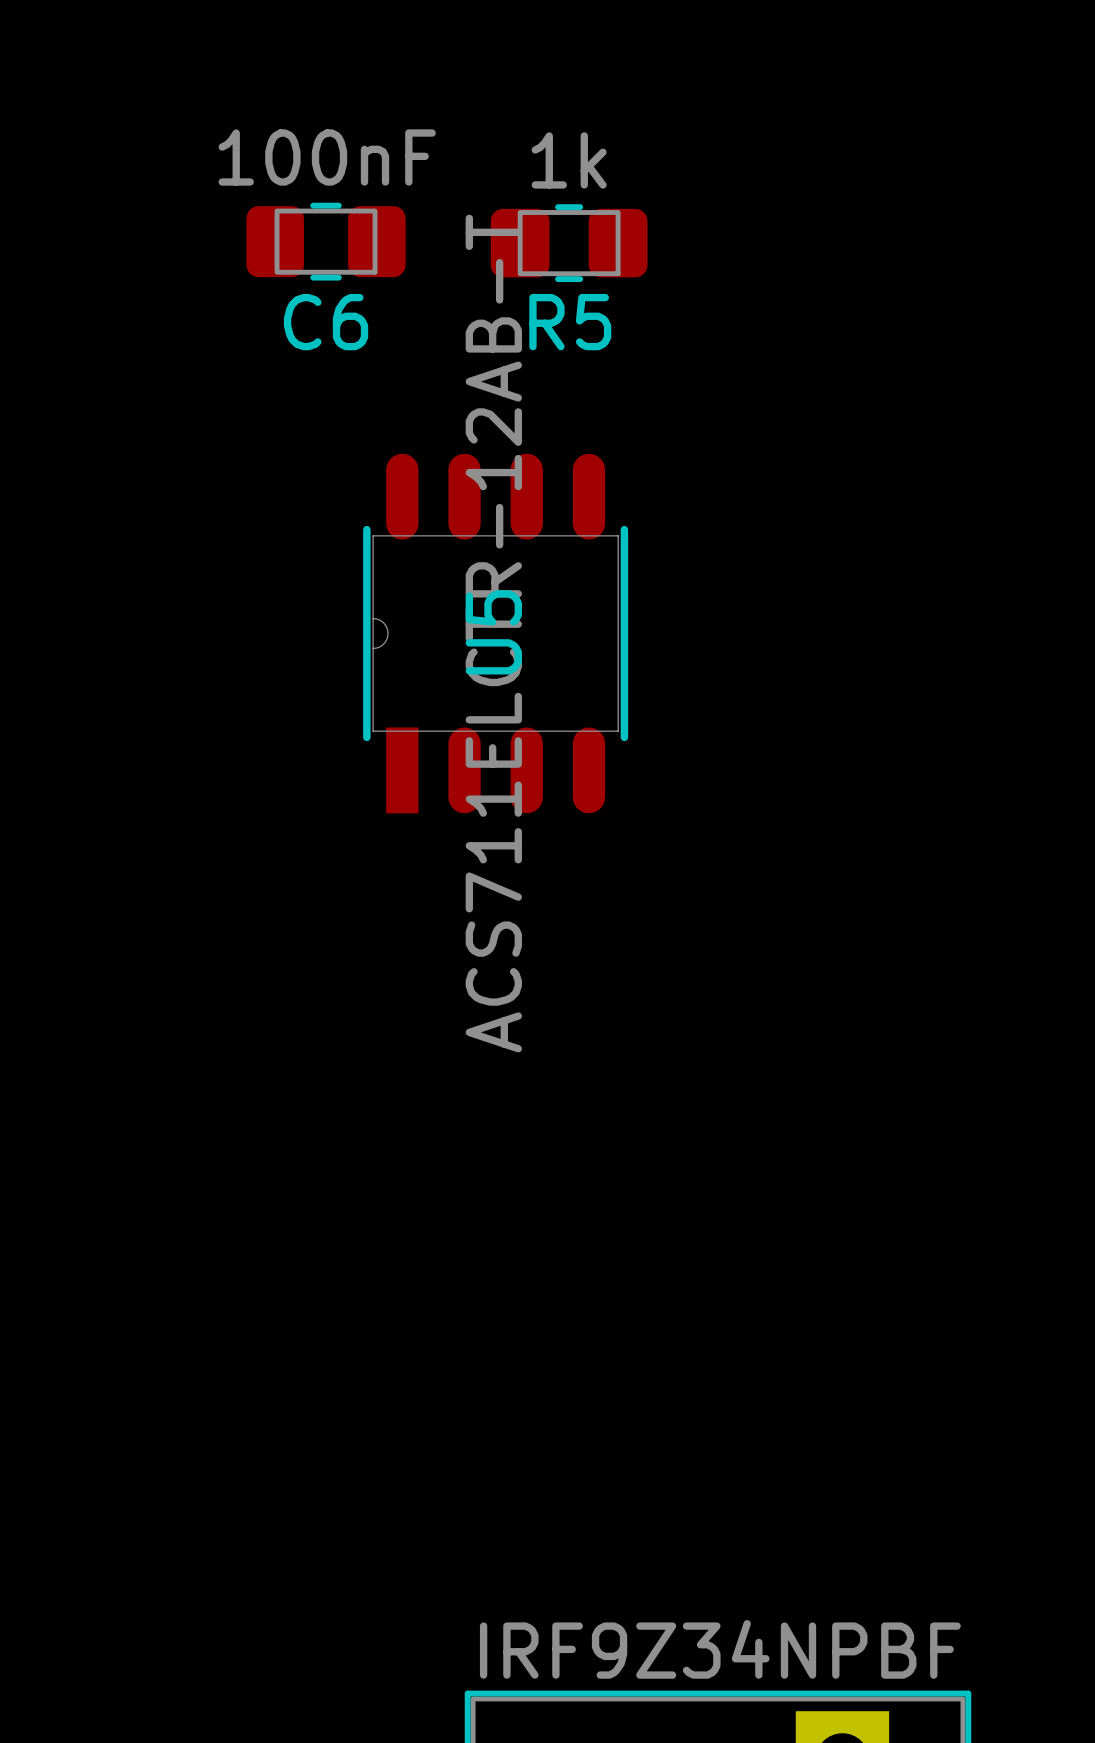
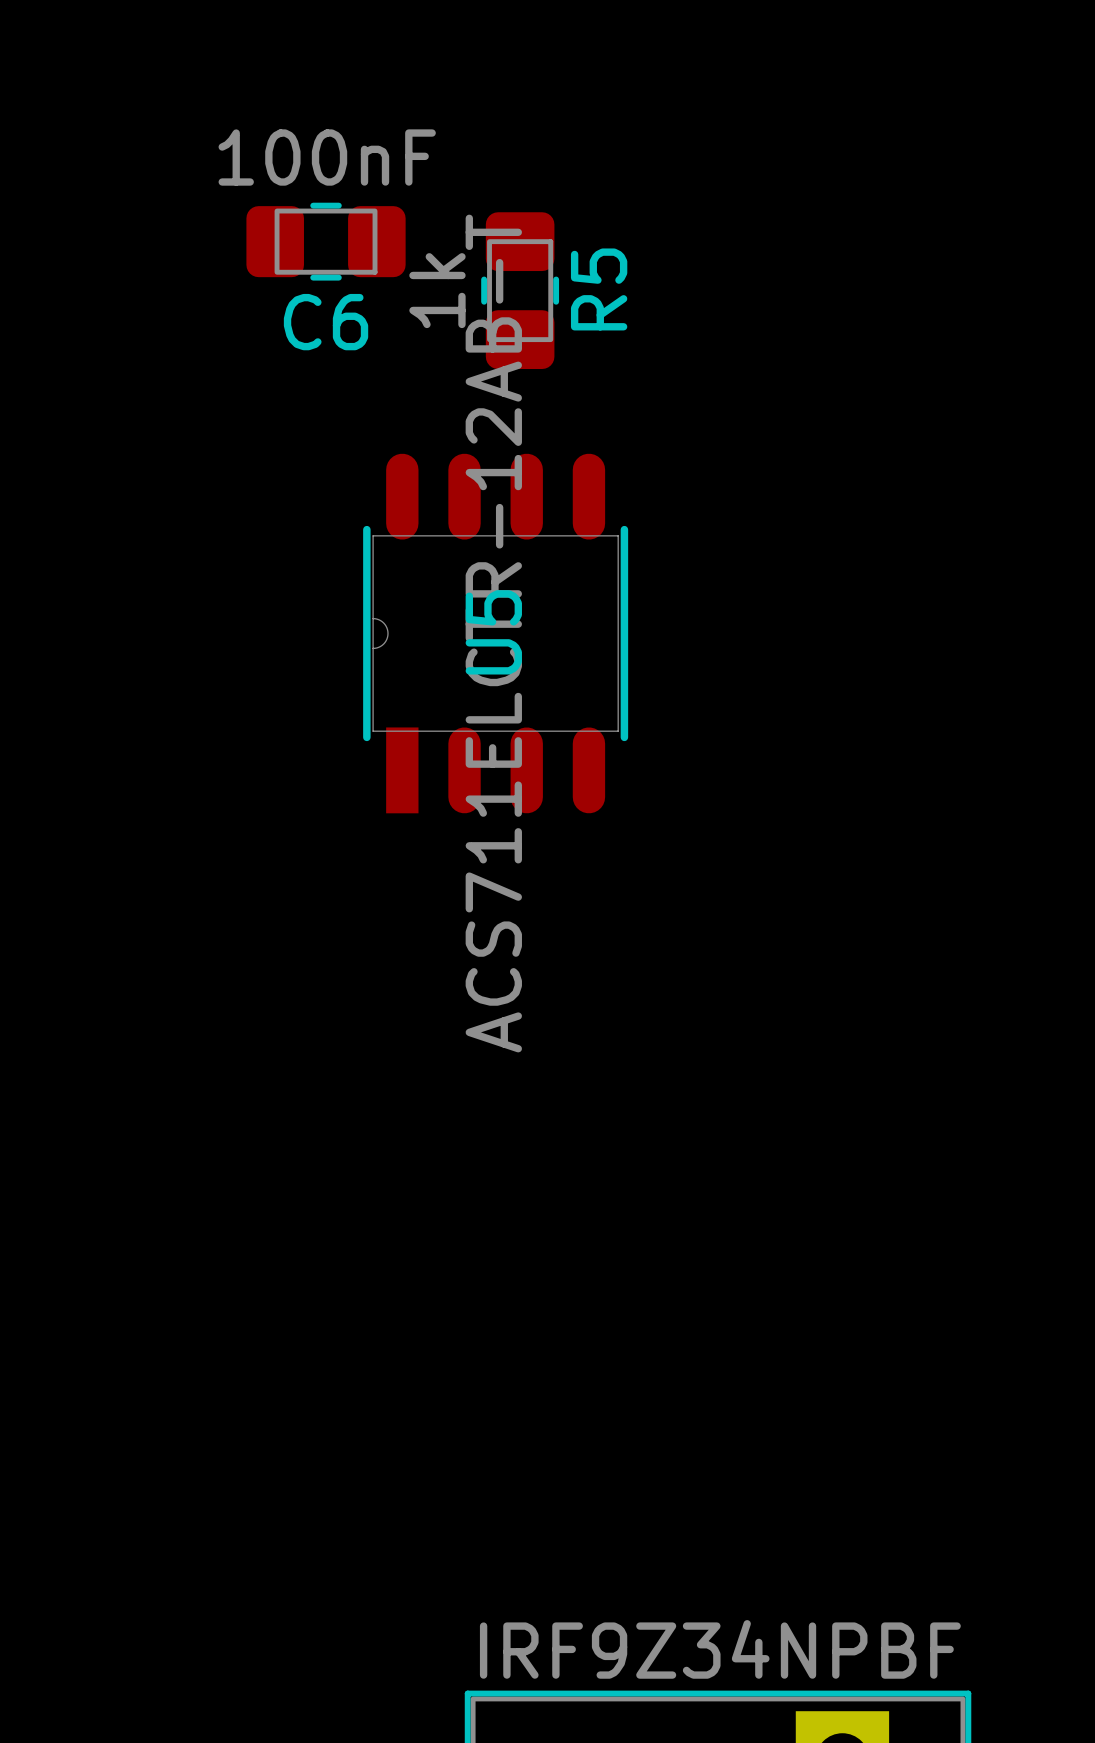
R5 value position: 1k (569, 160) -> 1k (437, 290)
R5 rotation: 0° (569, 243) -> 90° clockwise (520, 290)
R5 name position: R5 (570, 322) -> R5 (599, 289)

